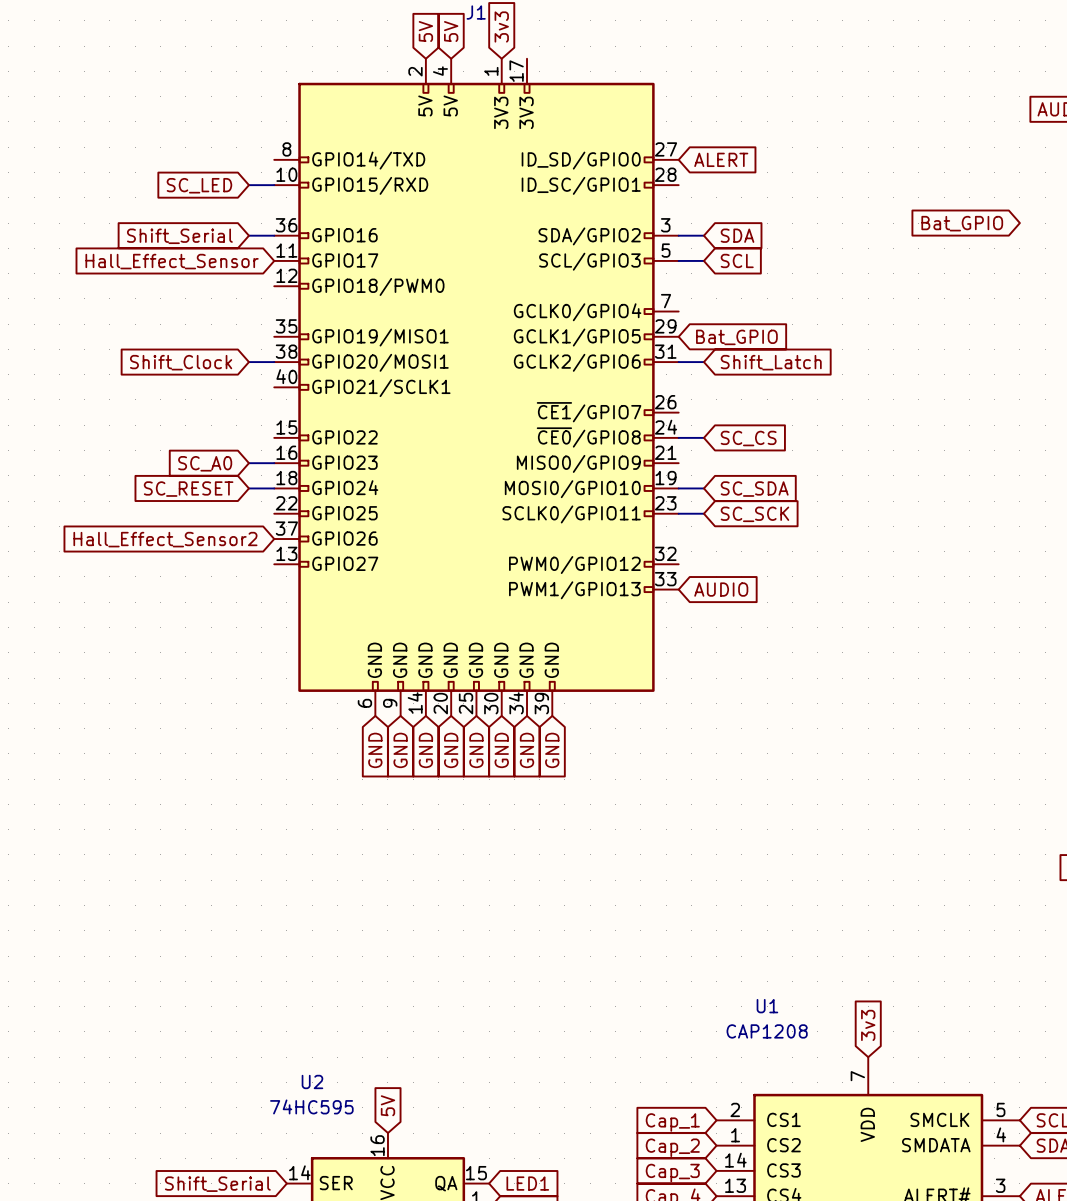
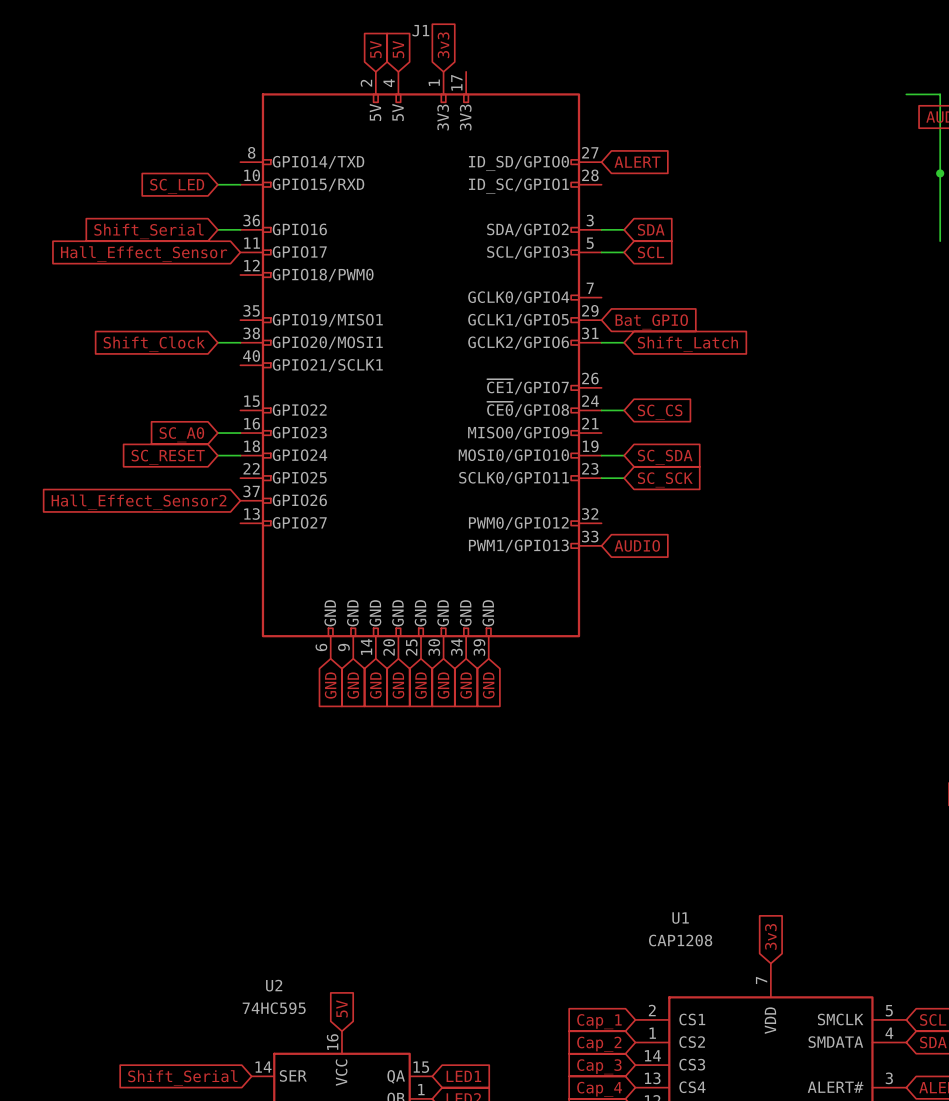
wire: none -> (906, 94) (940, 94) (940, 241)
junction: none -> (940, 173)
global label: Bat_GPIO (962, 223) -> none

